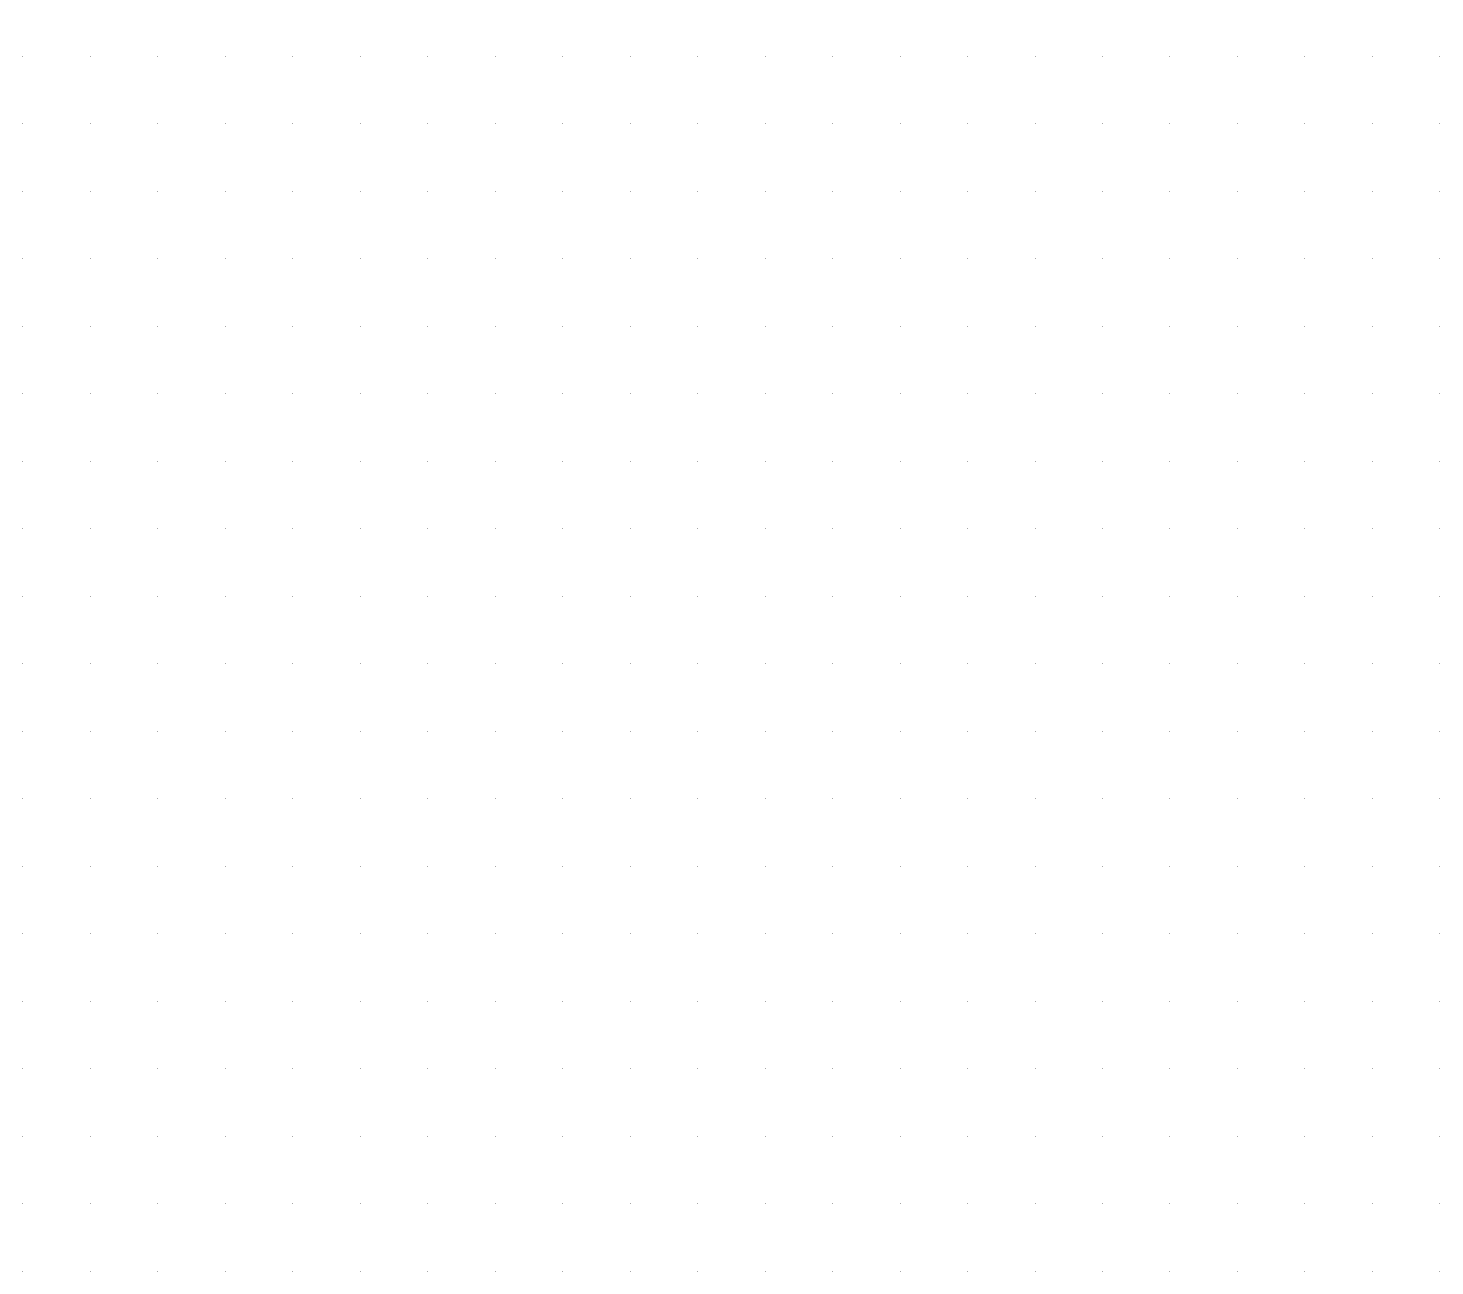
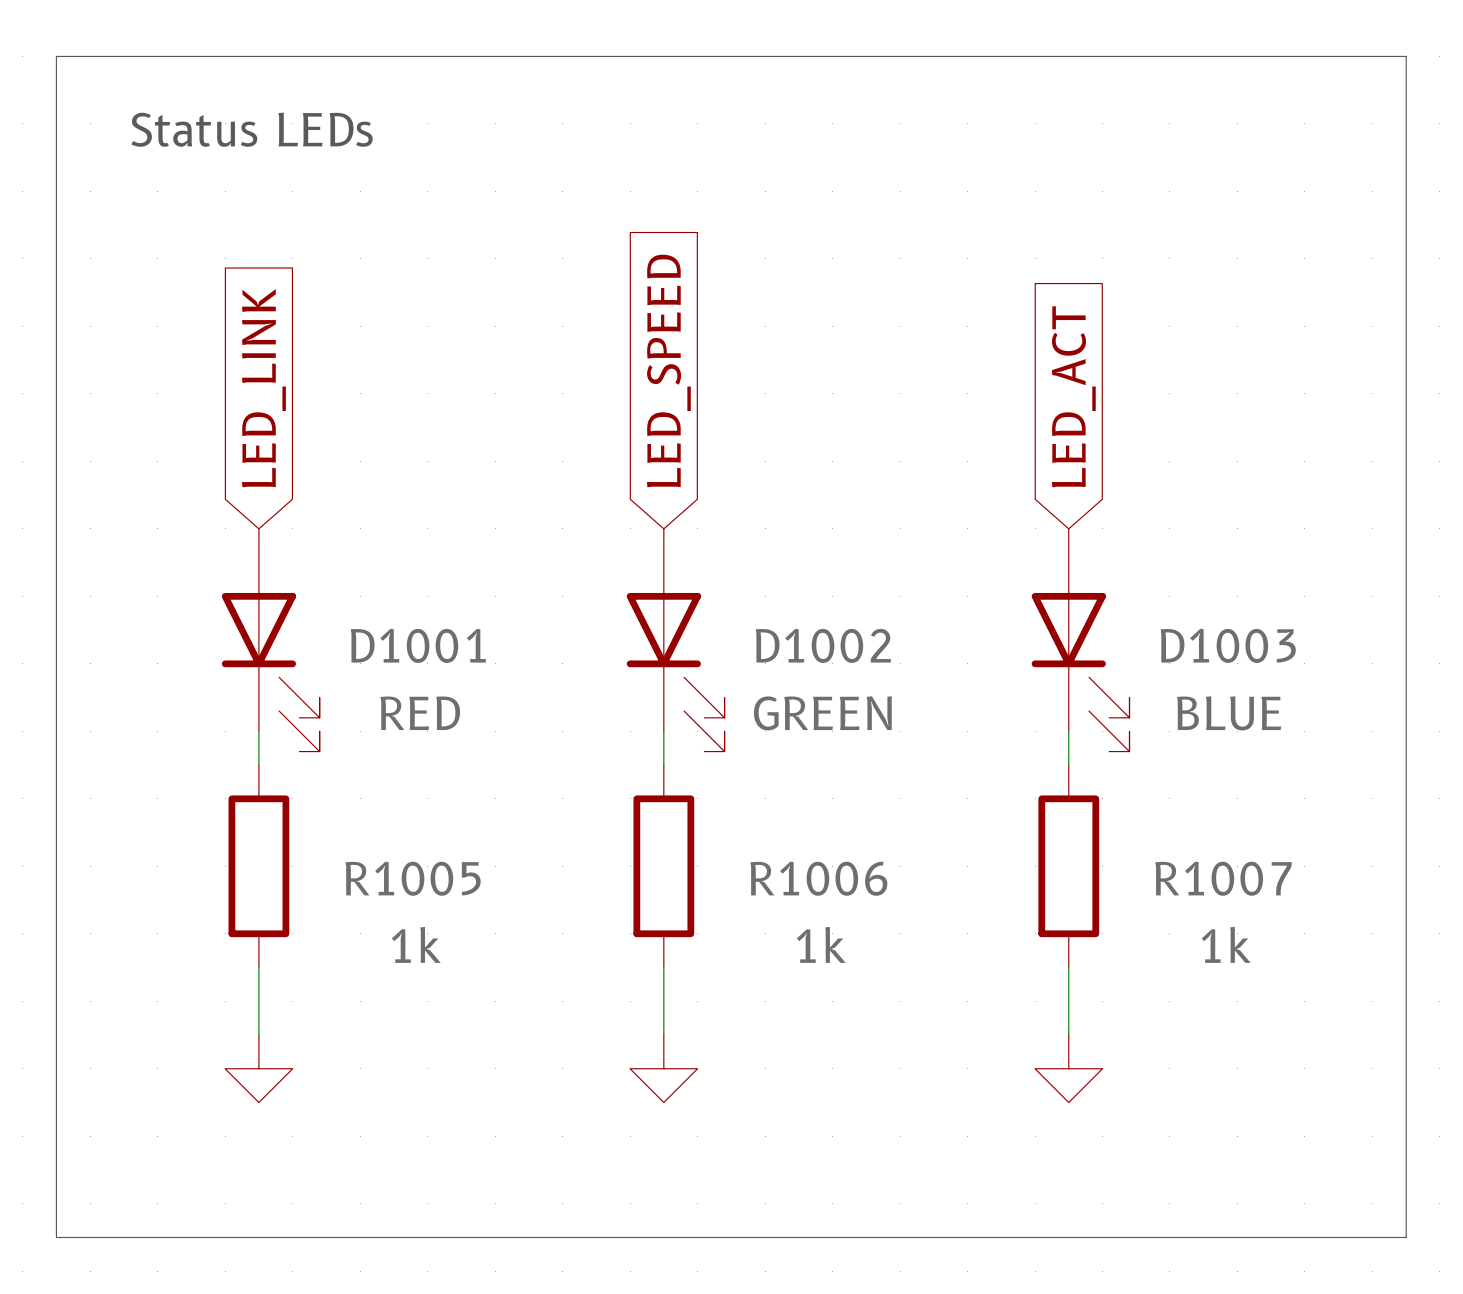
line: none -> (56, 56) (1406, 56) (1406, 1237) (56, 1237) (56, 56)
text: none -> Status LEDs (252, 129)
global label: none -> LED_SPEED (668, 371)
global label: none -> LED_LINK (263, 388)
global label: none -> LED_ACT (1073, 396)
D1001: none -> RED (270, 640)
D1002: none -> GREEN (675, 640)
D1003: none -> BLUE (1080, 640)
wire: none -> (258, 731) (258, 765)
wire: none -> (663, 731) (663, 765)
wire: none -> (1068, 731) (1068, 765)
R1005: none -> 1k (258, 866)
R1006: none -> 1k (663, 866)
R1007: none -> 1k (1068, 866)
wire: none -> (258, 967) (258, 1035)
wire: none -> (663, 967) (663, 1035)
wire: none -> (1068, 967) (1068, 1035)
power symbol: none -> (258, 1068)
power symbol: none -> (663, 1068)
power symbol: none -> (1068, 1068)

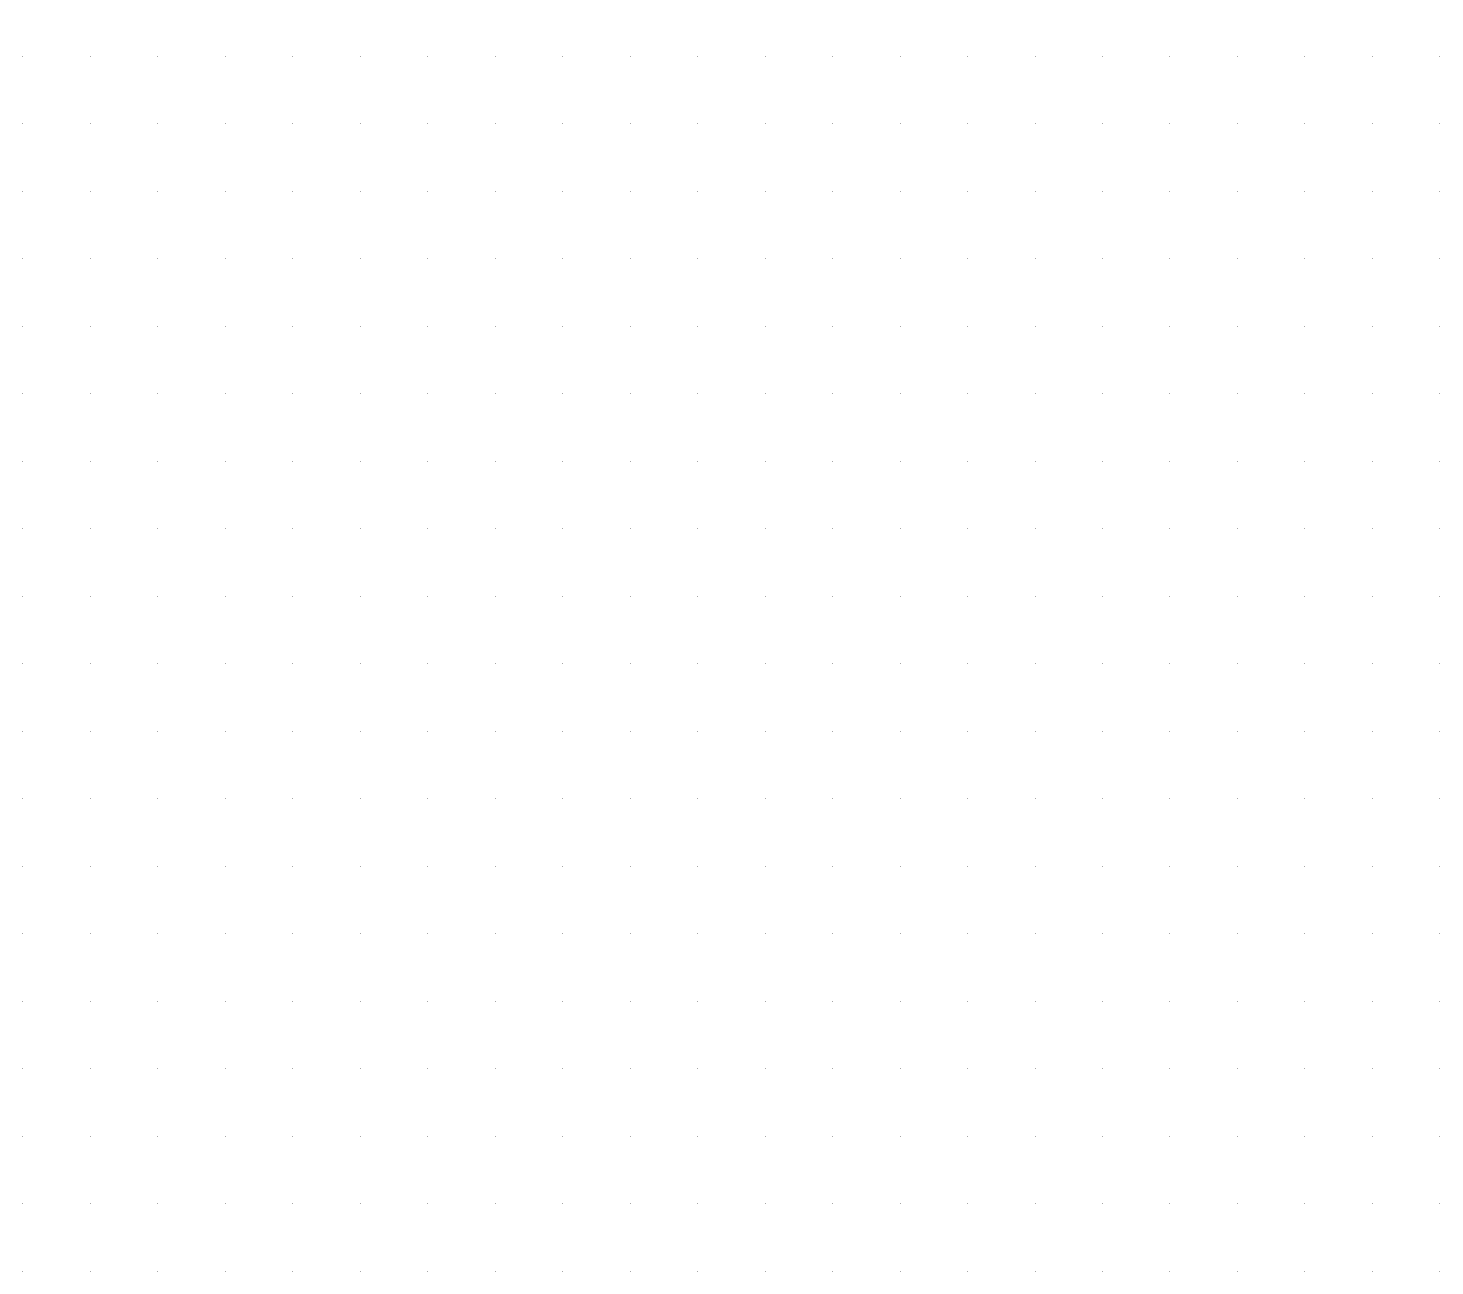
line: (56, 56) (1406, 56) (1406, 1237) (56, 1237) (56, 56) -> none
text: Status LEDs (252, 129) -> none
global label: LED_SPEED (668, 371) -> none
global label: LED_LINK (263, 388) -> none
global label: LED_ACT (1073, 396) -> none
D1001: RED (270, 640) -> none
D1002: GREEN (675, 640) -> none
D1003: BLUE (1080, 640) -> none
wire: (258, 731) (258, 765) -> none
wire: (663, 731) (663, 765) -> none
wire: (1068, 731) (1068, 765) -> none
R1005: 1k (258, 866) -> none
R1006: 1k (663, 866) -> none
R1007: 1k (1068, 866) -> none
wire: (258, 967) (258, 1035) -> none
wire: (663, 967) (663, 1035) -> none
wire: (1068, 967) (1068, 1035) -> none
power symbol: (258, 1068) -> none
power symbol: (663, 1068) -> none
power symbol: (1068, 1068) -> none

